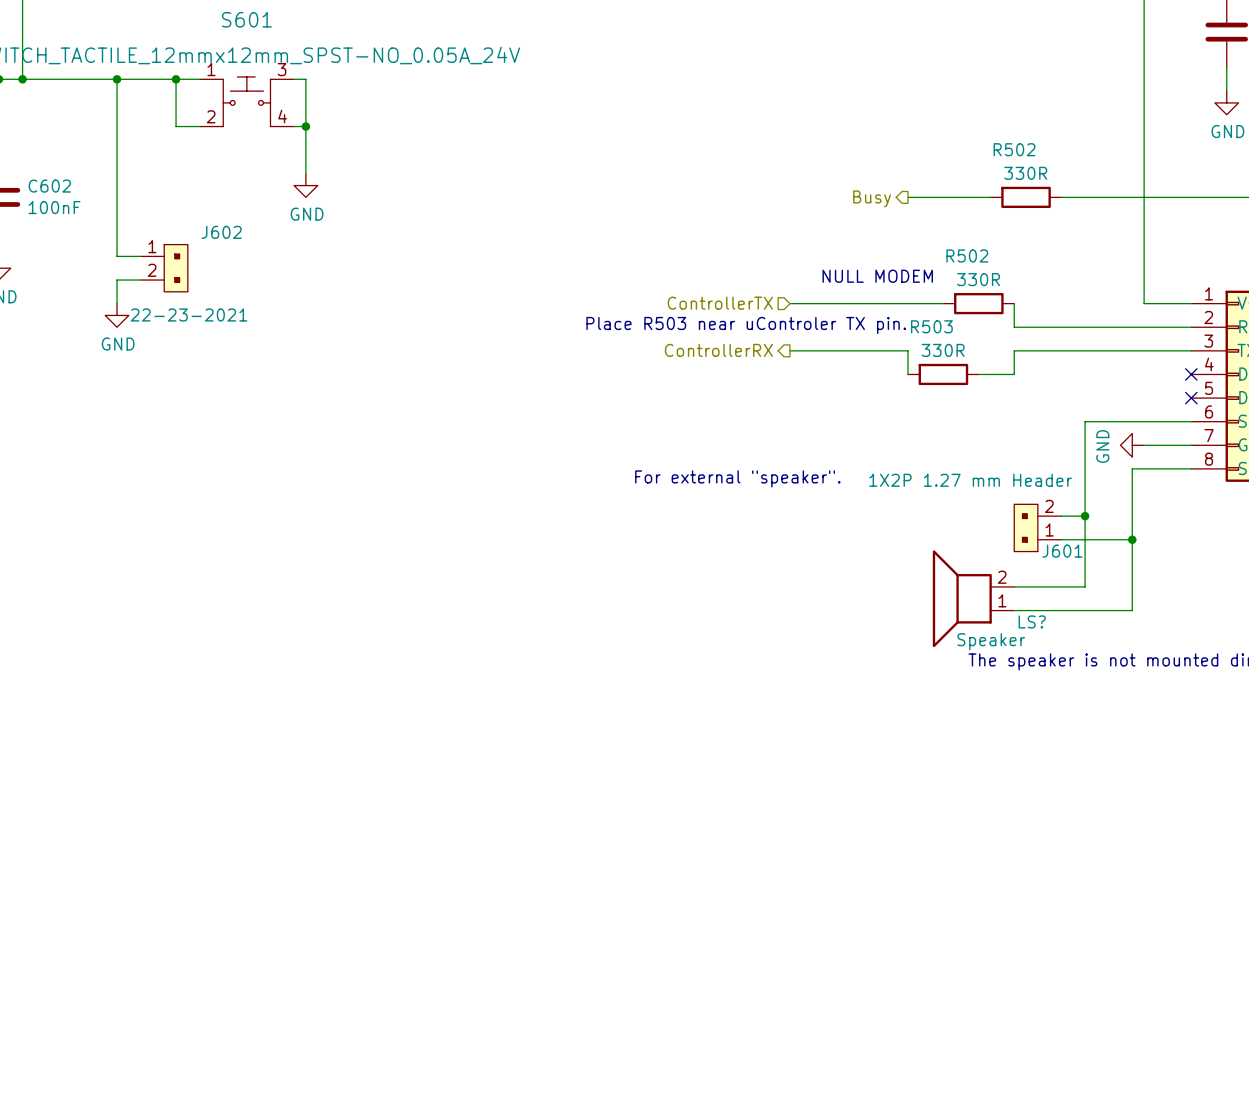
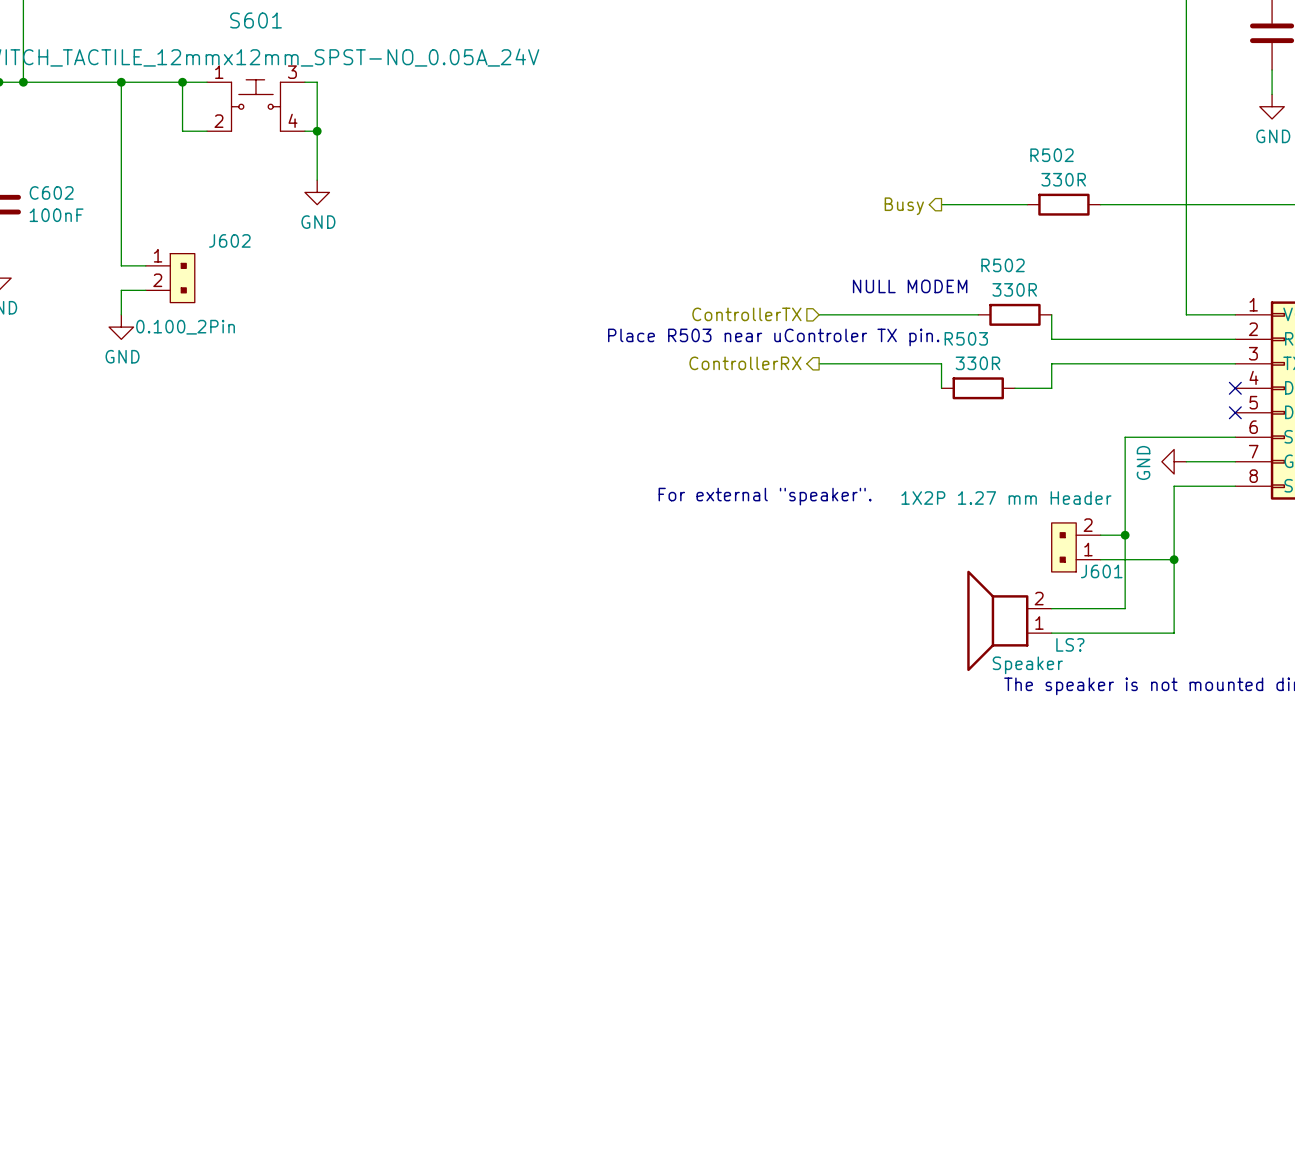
J602 value: 22-23-2021 (189, 314) -> 0.100_2Pin (185, 327)

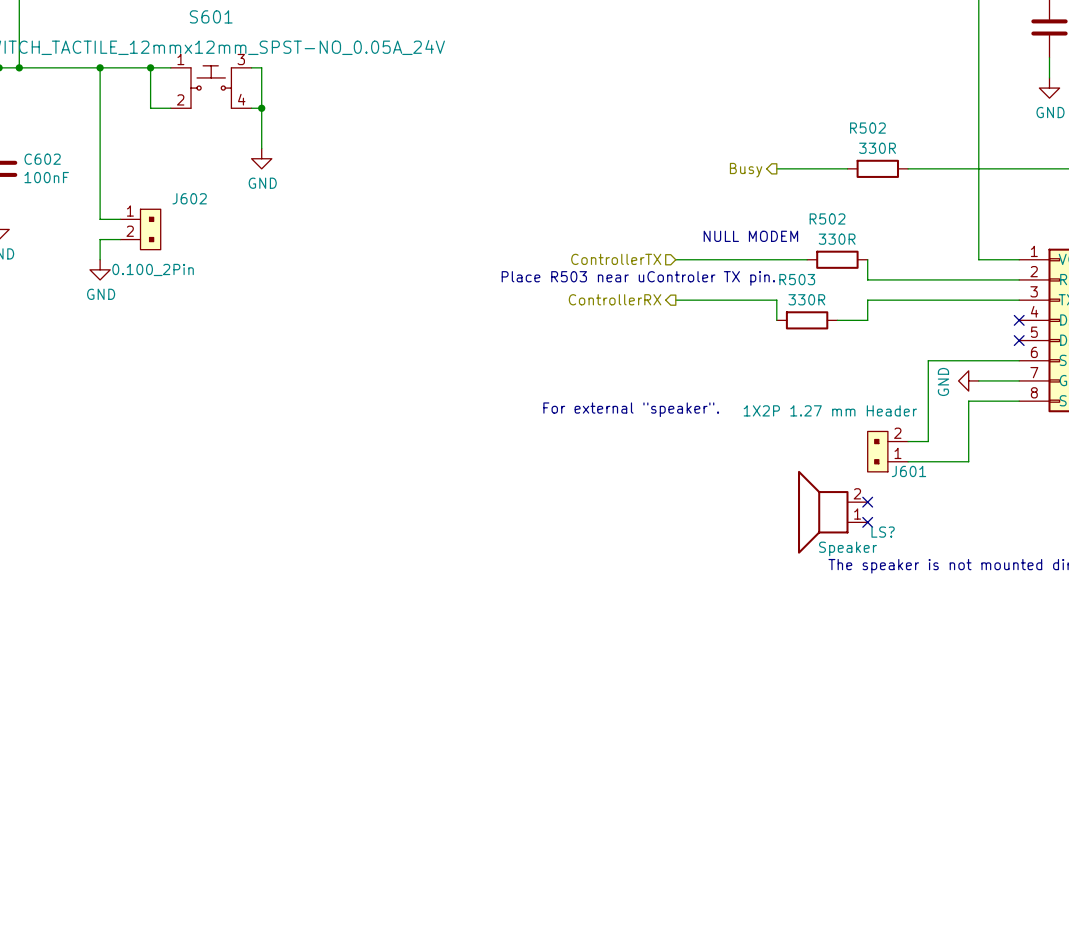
wire: (1125, 535) (1125, 608) (1051, 608) -> none
junction: (1125, 535) -> none
wire: (1174, 559) (1174, 633) (1051, 633) -> none
junction: (1174, 559) -> none
no-connect mark: none -> (867, 502)
no-connect mark: none -> (867, 522)

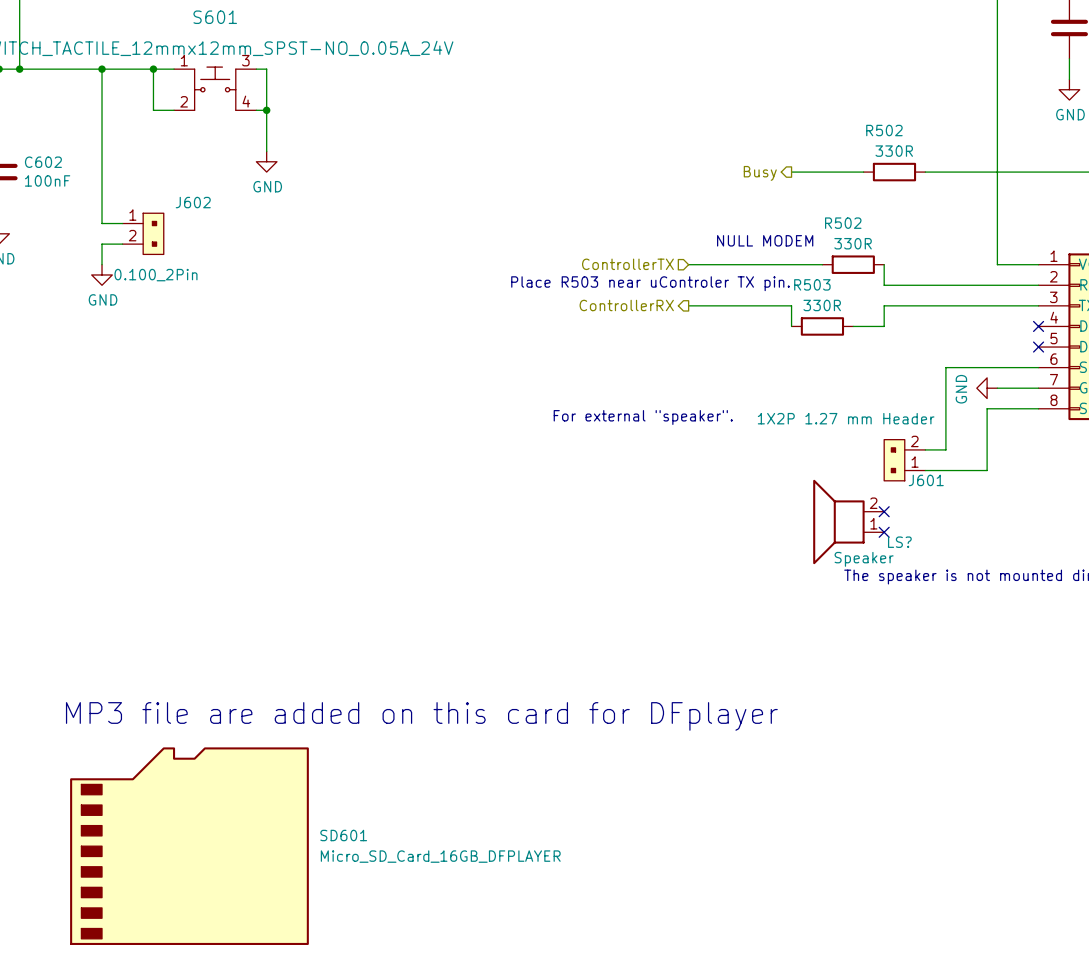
text: none -> MP3 file are added on this card for DFplayer (421, 716)
SD601: none -> Micro_SD_Card_16GB_DFPLAYER (189, 846)

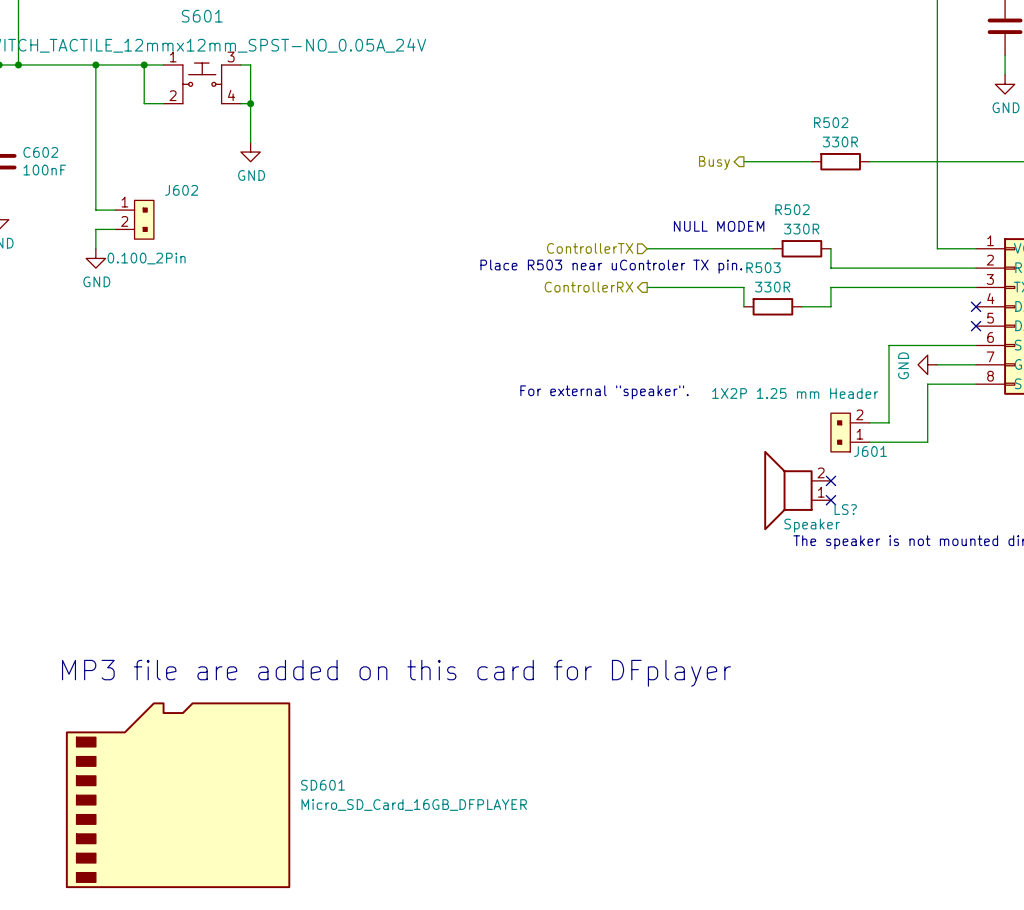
J601 value: 1X2P 1.27 mm Header (846, 418) -> 1X2P 1.25 mm Header (795, 393)

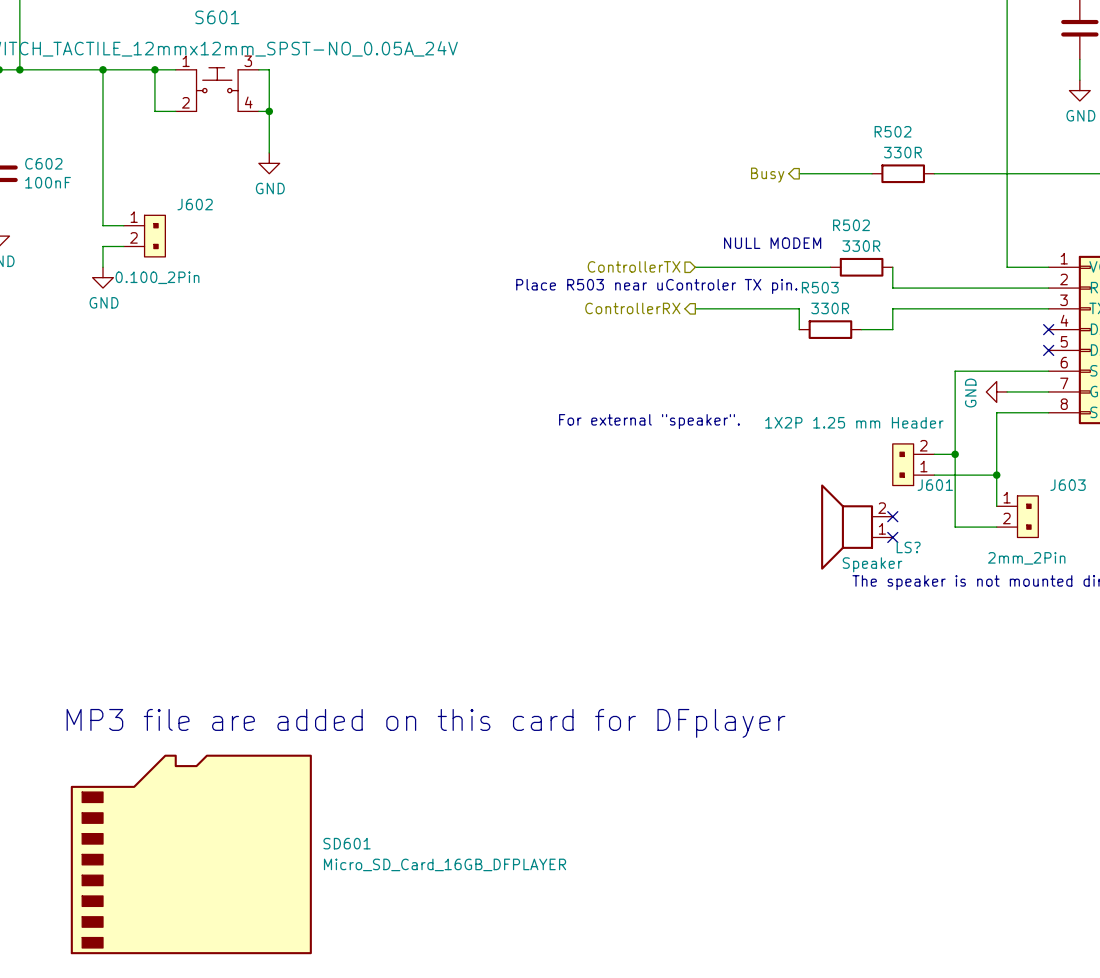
wire: none -> (955, 454) (955, 527) (996, 527)
junction: none -> (955, 454)
wire: none -> (996, 475) (996, 506)
junction: none -> (996, 475)
J603: none -> 2mm_2Pin (1017, 516)

